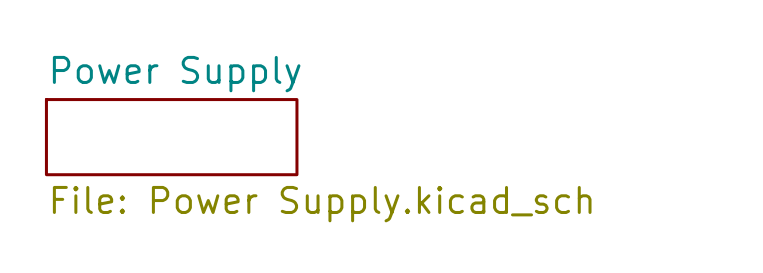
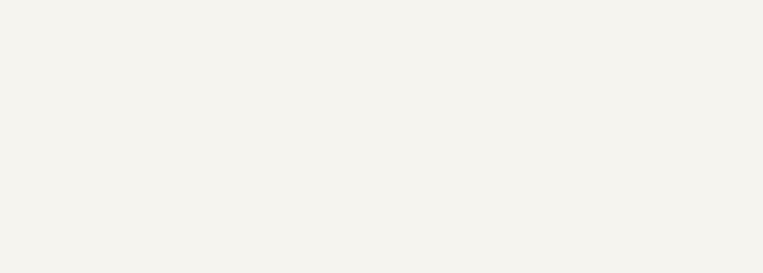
sheet Power Supply: File: Power Supply.kicad_sch (171, 137) -> none

